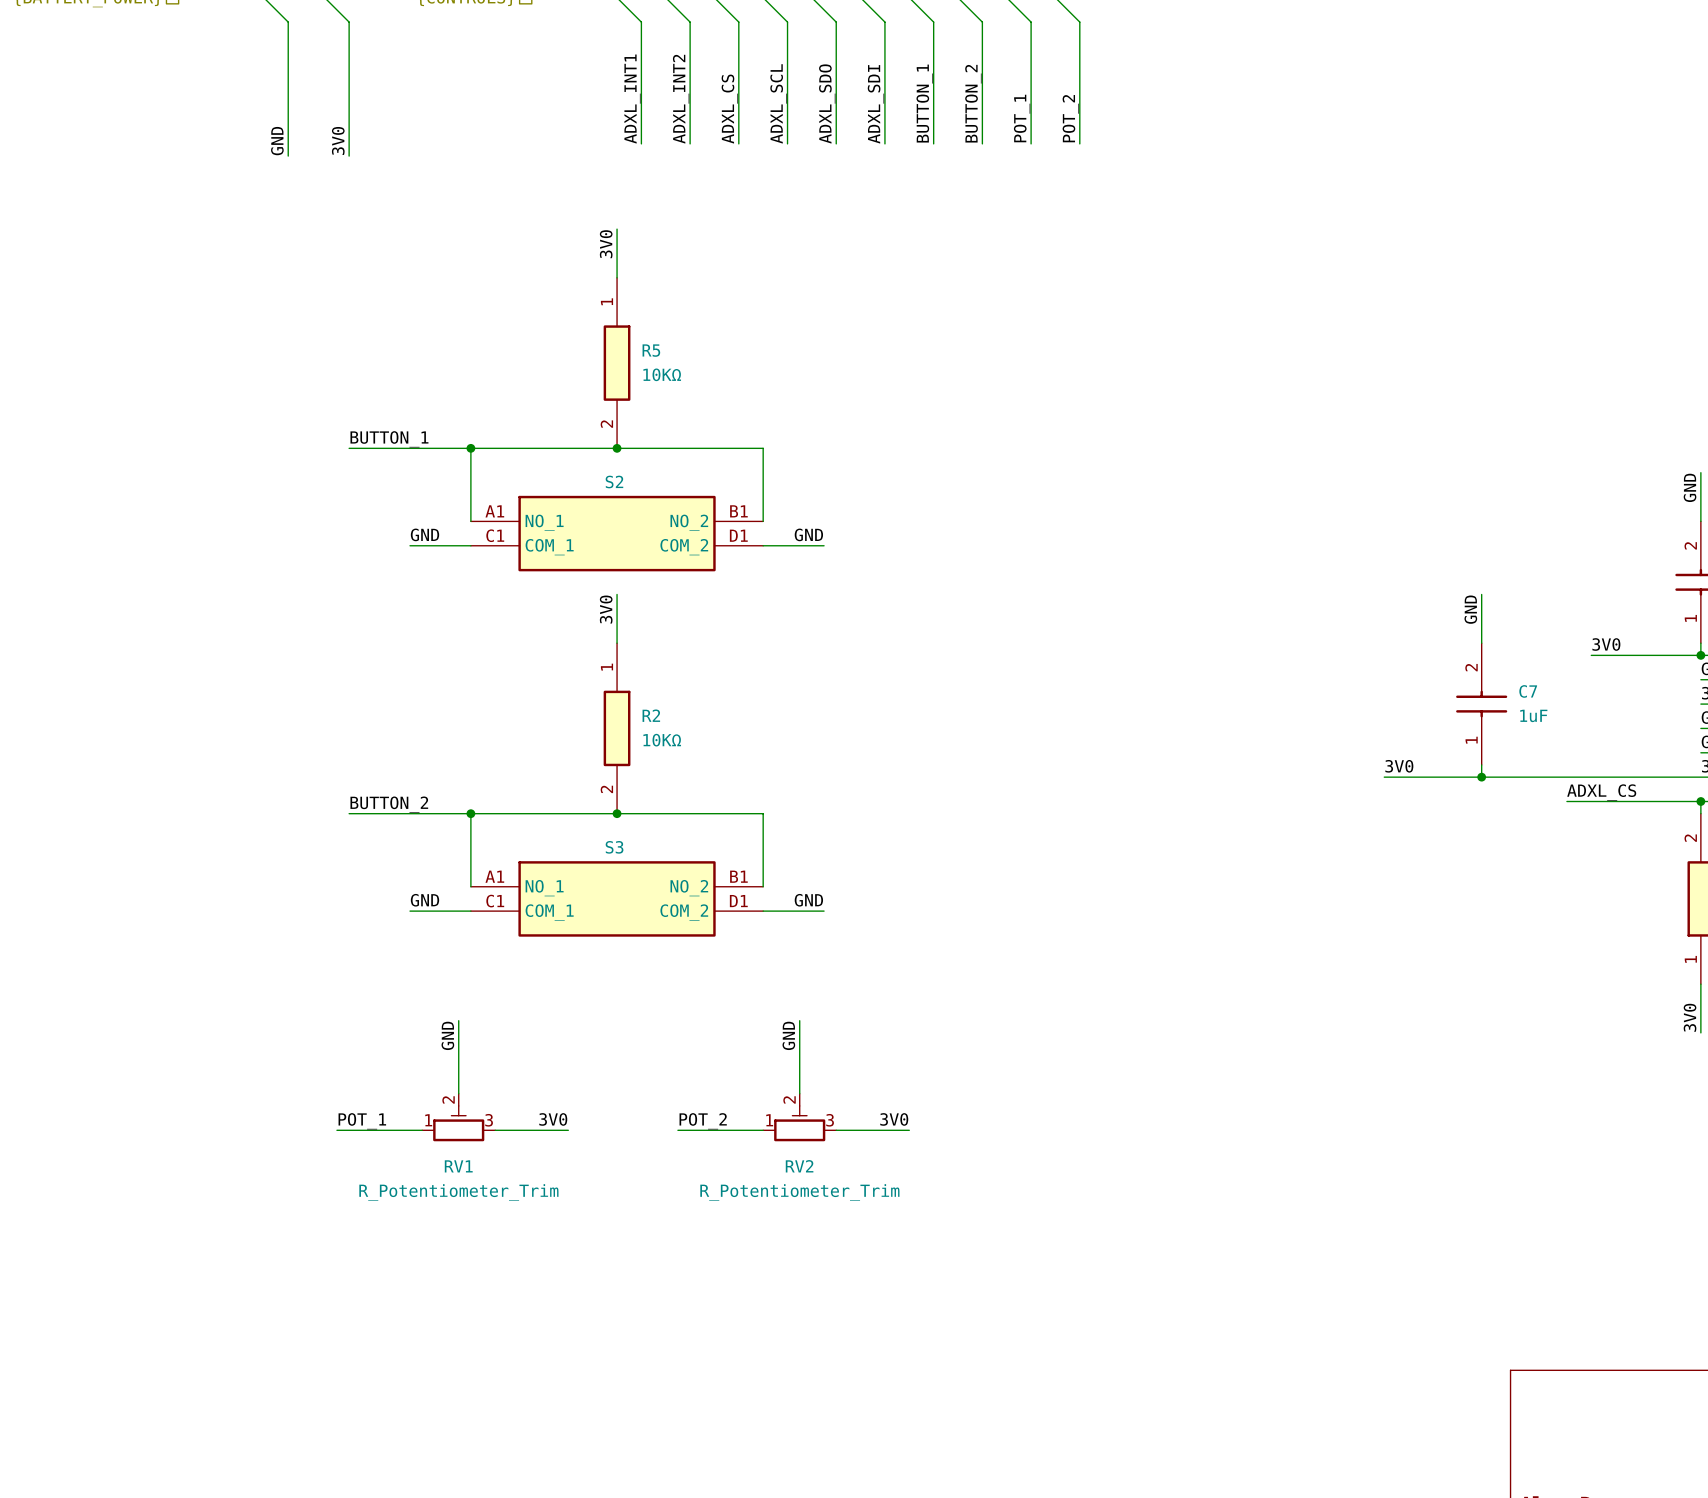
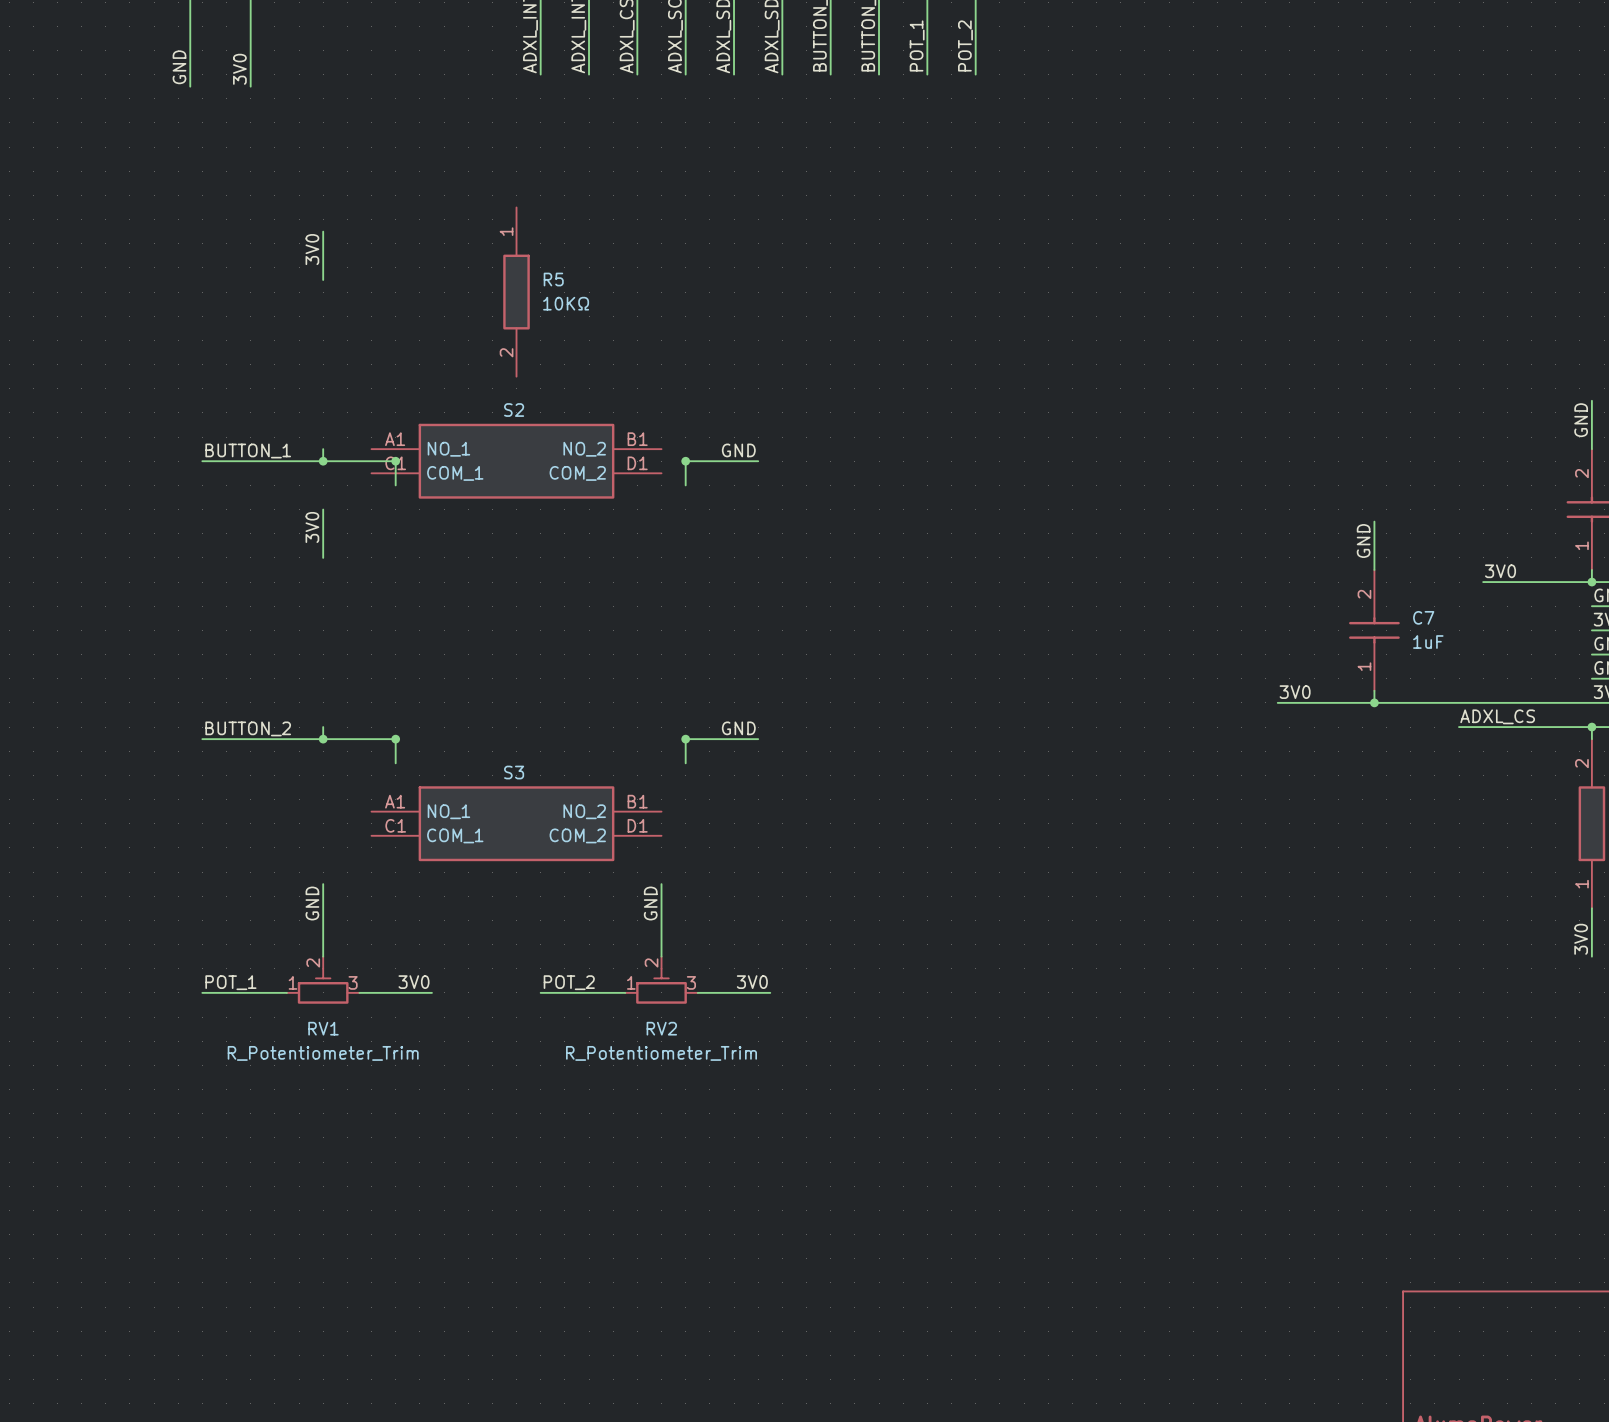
wire: (617, 229) (617, 277) -> (323, 231) (323, 279)
label: 3V0 (606, 244) -> none
label: none -> 3V0 (312, 249)
label position: BUTTON_1 (389, 439) -> BUTTON_1 (248, 451)
wire: (349, 448) (763, 448) (763, 521) -> none
wire: (470, 448) (470, 521) -> none
junction: (470, 448) -> none
junction: (617, 448) -> none
wire: none -> (323, 449) (323, 461)
wire: none -> (202, 461) (395, 461) (395, 485)
junction: none -> (323, 461)
junction: none -> (395, 461)
junction: none -> (685, 461)
wire: none -> (758, 461) (685, 461) (685, 485)
label: GND (424, 534) -> none
label position: GND (808, 534) -> GND (738, 450)
wire: (410, 545) (470, 545) -> none
wire: (763, 545) (824, 545) -> none
wire: (617, 594) (617, 643) -> (323, 509) (323, 557)
label: none -> 3V0 (312, 527)
label: 3V0 (606, 609) -> none
R2: 10KΩ (617, 728) -> none
wire: none -> (323, 727) (323, 739)
label: none -> GND (738, 728)
label position: BUTTON_2 (389, 804) -> BUTTON_2 (248, 728)
wire: none -> (202, 739) (250, 739)
junction: none -> (323, 739)
wire: (470, 813) (470, 886) -> none
junction: (470, 813) -> none
wire: (495, 813) (763, 813) (763, 886) -> (395, 739) (395, 763)
junction: none -> (395, 739)
junction: (617, 813) -> none
junction: none -> (685, 739)
wire: none -> (758, 739) (685, 739) (685, 763)
label: GND (424, 900) -> none
label: GND (808, 900) -> none
wire: (410, 911) (470, 911) -> none
wire: (763, 911) (824, 911) -> none
label: none -> GND (312, 903)
label: none -> GND (650, 903)
wire: (458, 1020) (458, 1093) -> (323, 884) (323, 956)
wire: (799, 1020) (799, 1093) -> (661, 884) (661, 956)
label: GND (447, 1035) -> none
label: GND (788, 1035) -> none
RV1 position: (458, 1117) -> (323, 980)
RV2 position: (799, 1117) -> (661, 980)
label position: 3V0 (553, 1119) -> 3V0 (414, 982)
label position: 3V0 (894, 1119) -> 3V0 (752, 982)
label position: POT_1 (362, 1121) -> POT_1 (230, 982)
label position: POT_2 (703, 1121) -> POT_2 (569, 982)
wire: (336, 1130) (422, 1130) -> (202, 992) (286, 992)
wire: (495, 1130) (568, 1130) -> (359, 992) (431, 992)
wire: (677, 1130) (763, 1130) -> (540, 992) (625, 992)
wire: (836, 1130) (909, 1130) -> (697, 992) (770, 992)

